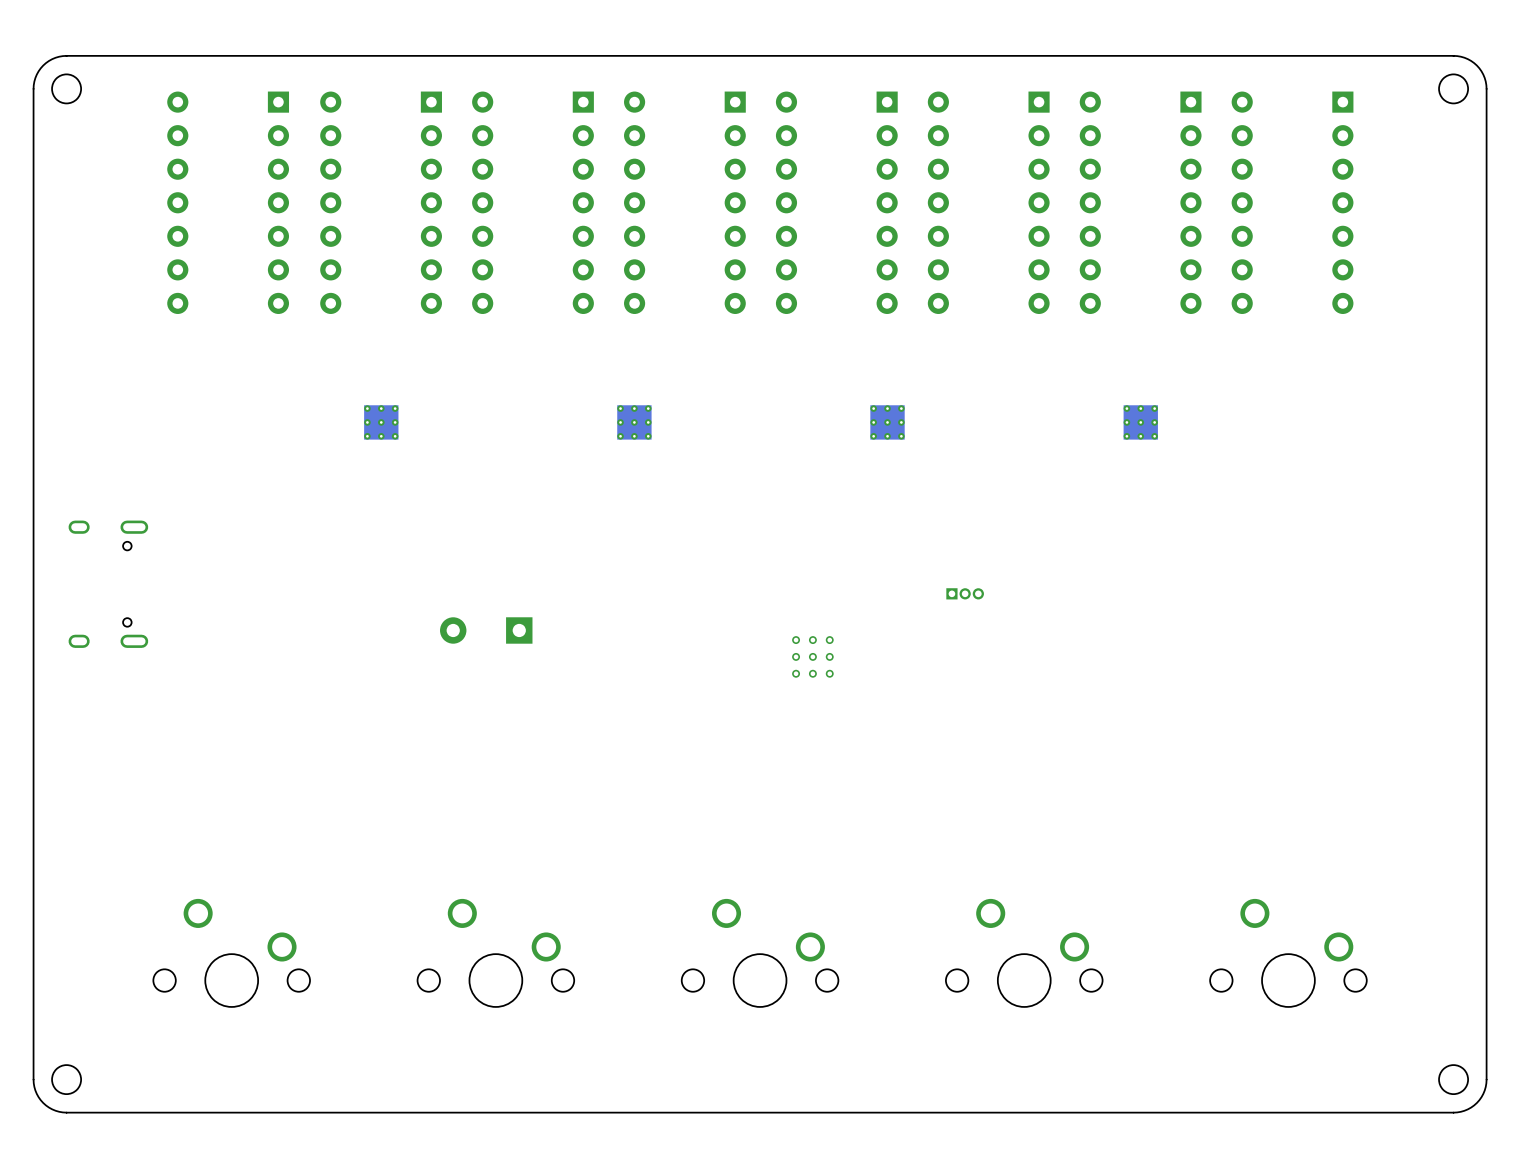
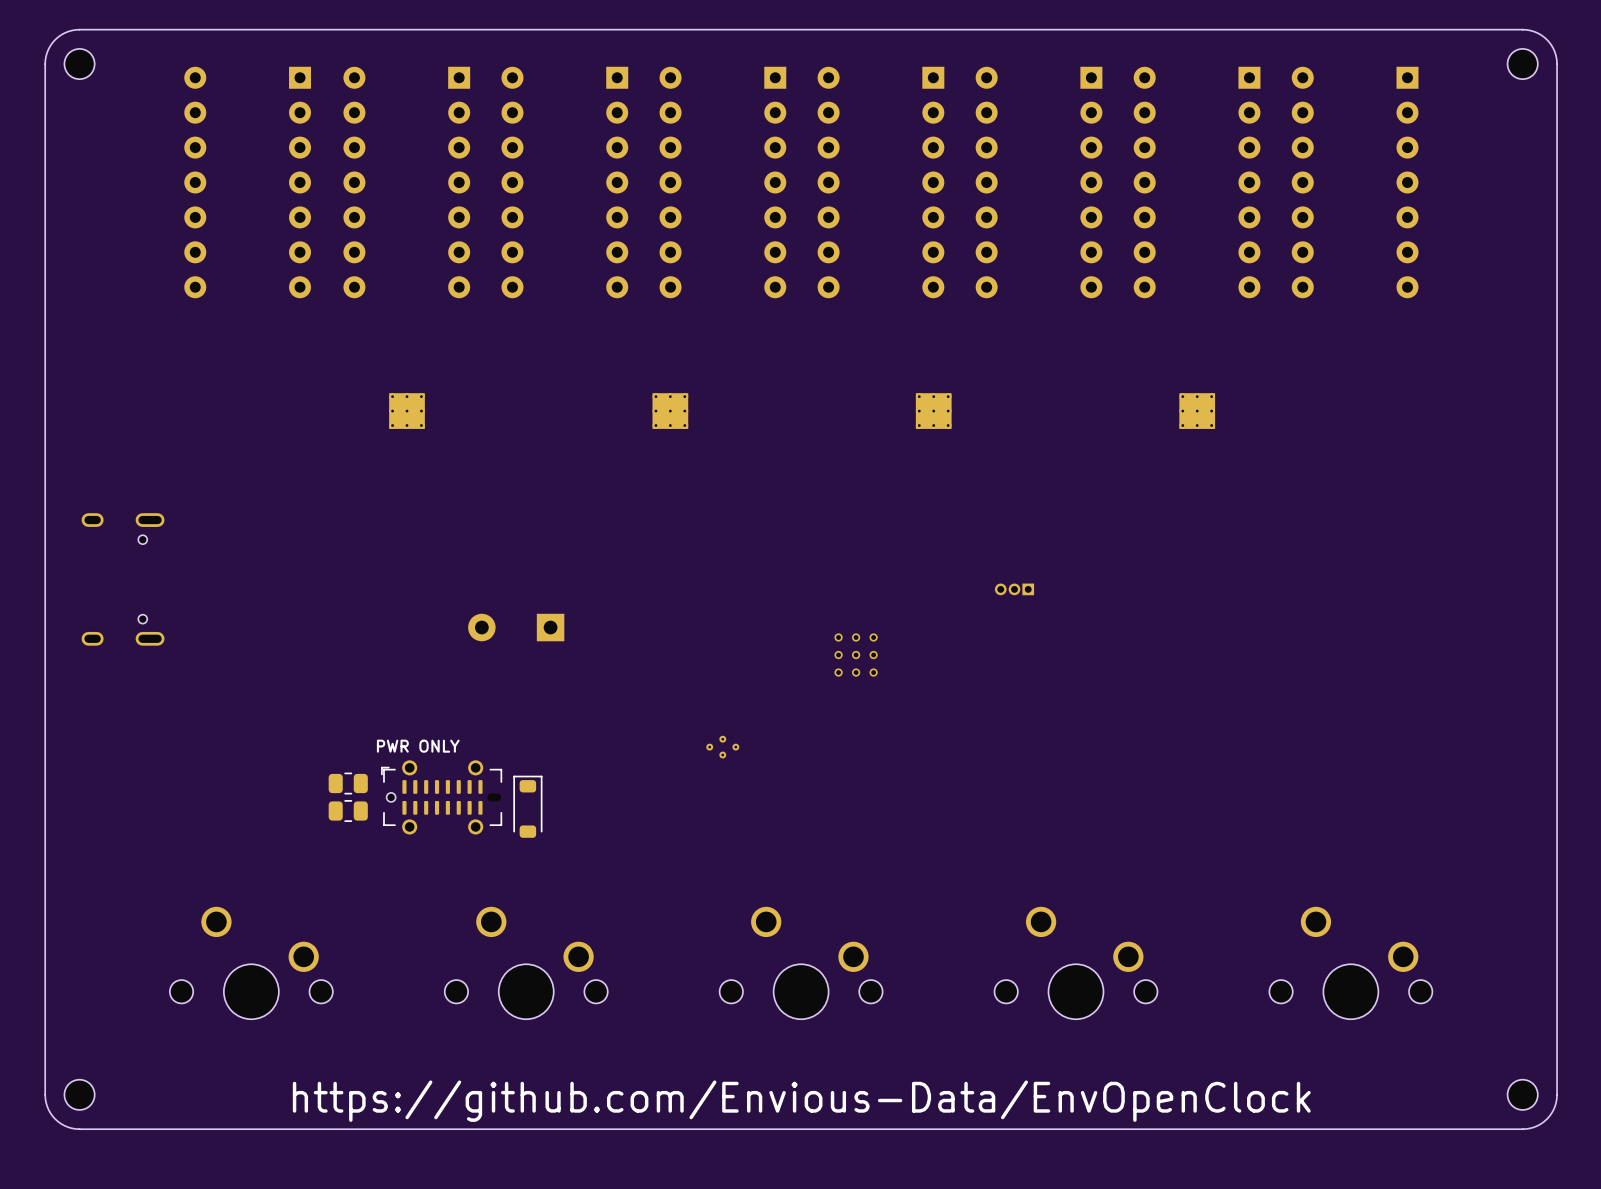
part rotation: 0° (965, 593) -> 180° (1014, 589)
text: none -> PWR ONLY (418, 746)
part: none -> (722, 747)
part: none -> (348, 783)
part: none -> (441, 797)
part: none -> (527, 806)
part: none -> (348, 811)
text: none -> https://github.com/Envious-Data/EnvOpenClock (801, 1101)

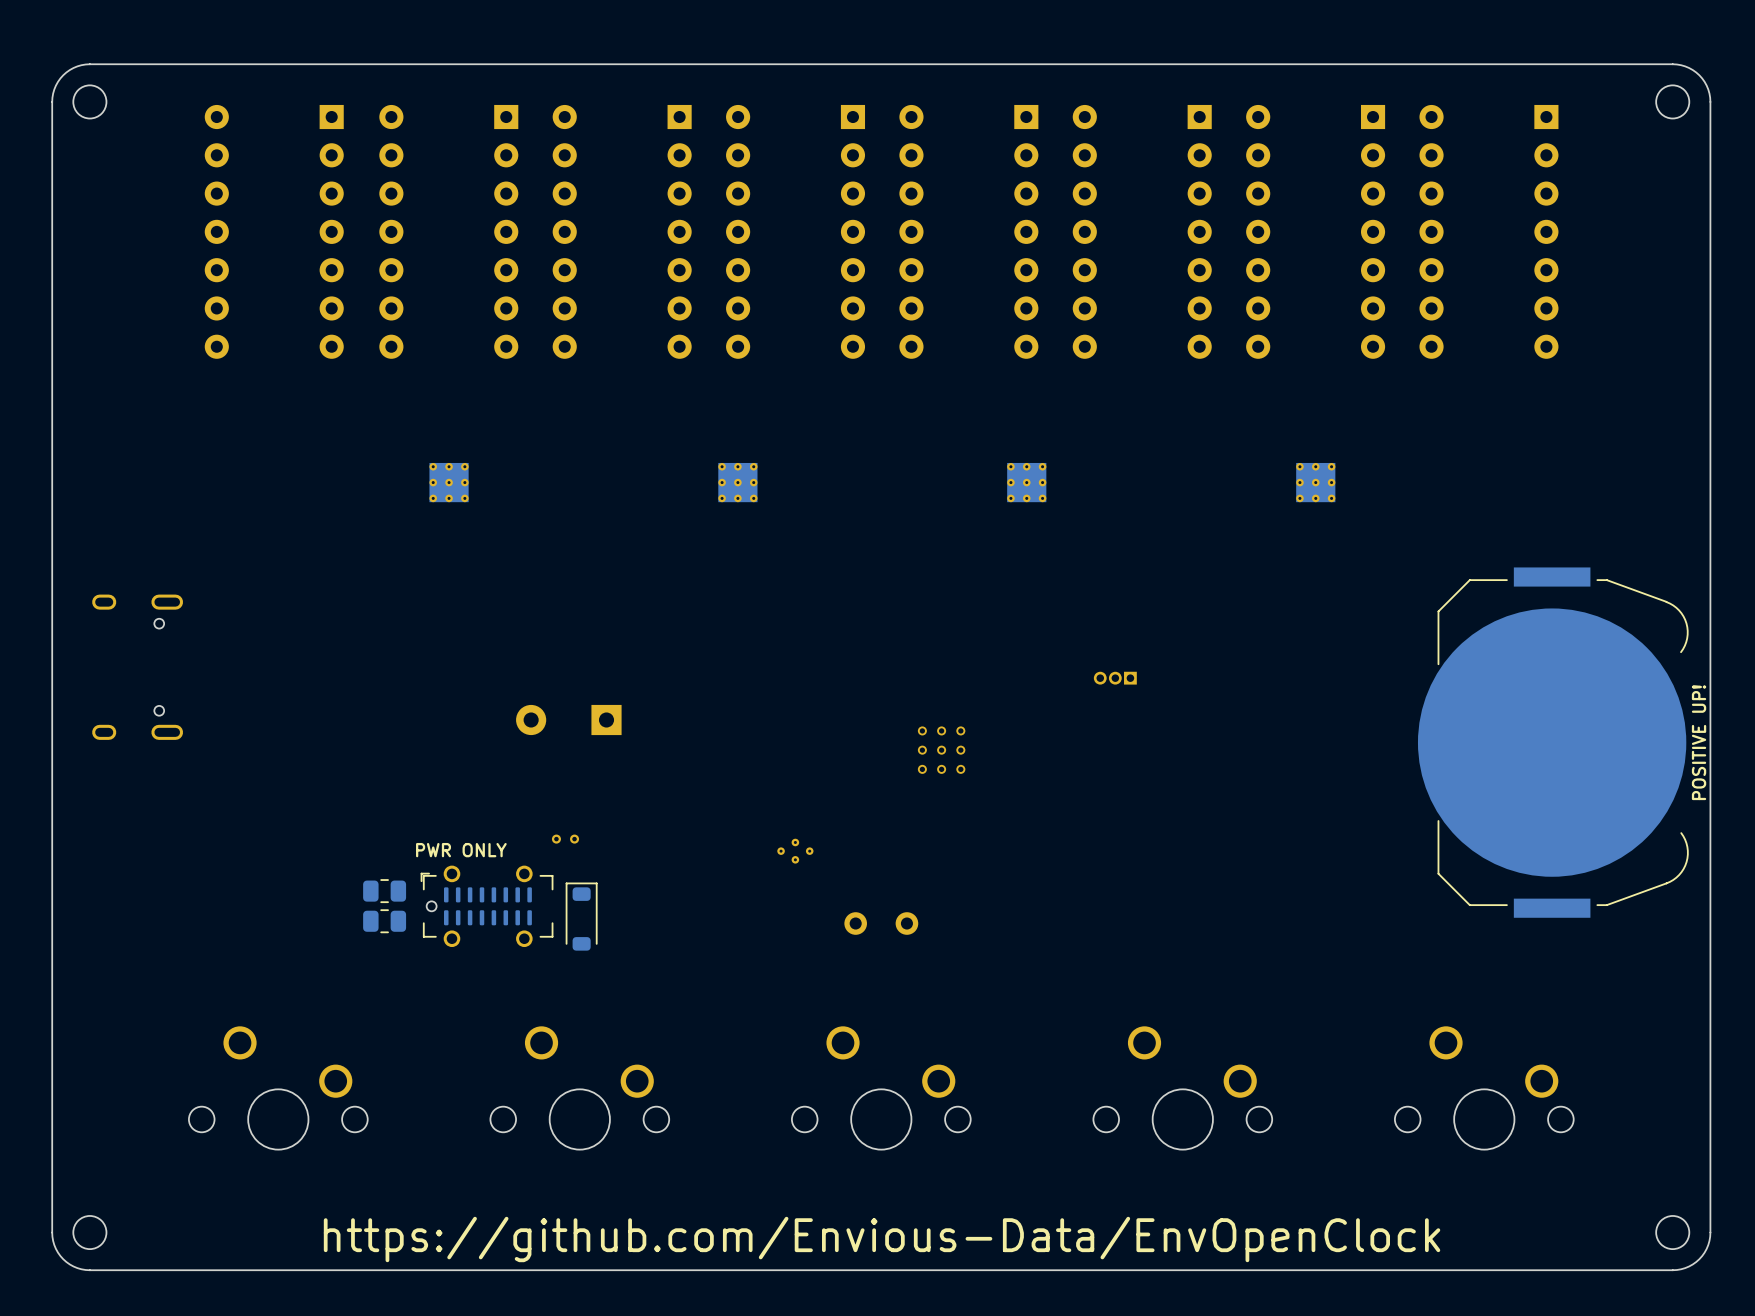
part: none -> (1553, 742)
text: none -> POSITIVE UP! (1699, 742)
part: none -> (565, 839)
part: none -> (881, 923)

